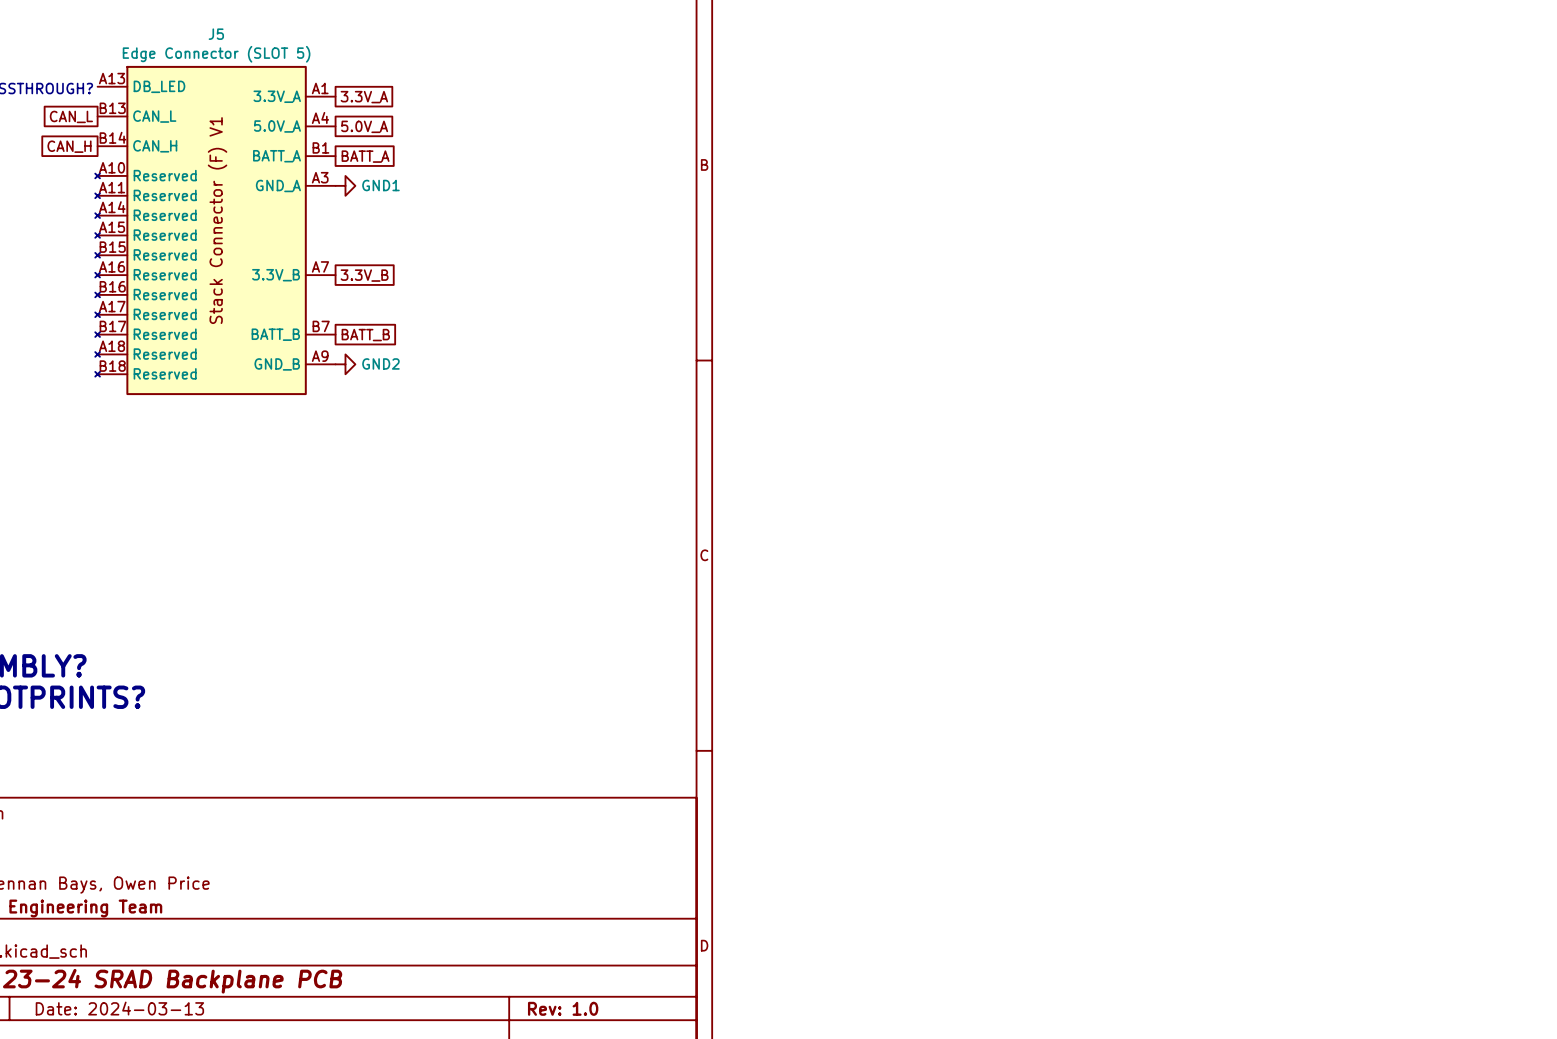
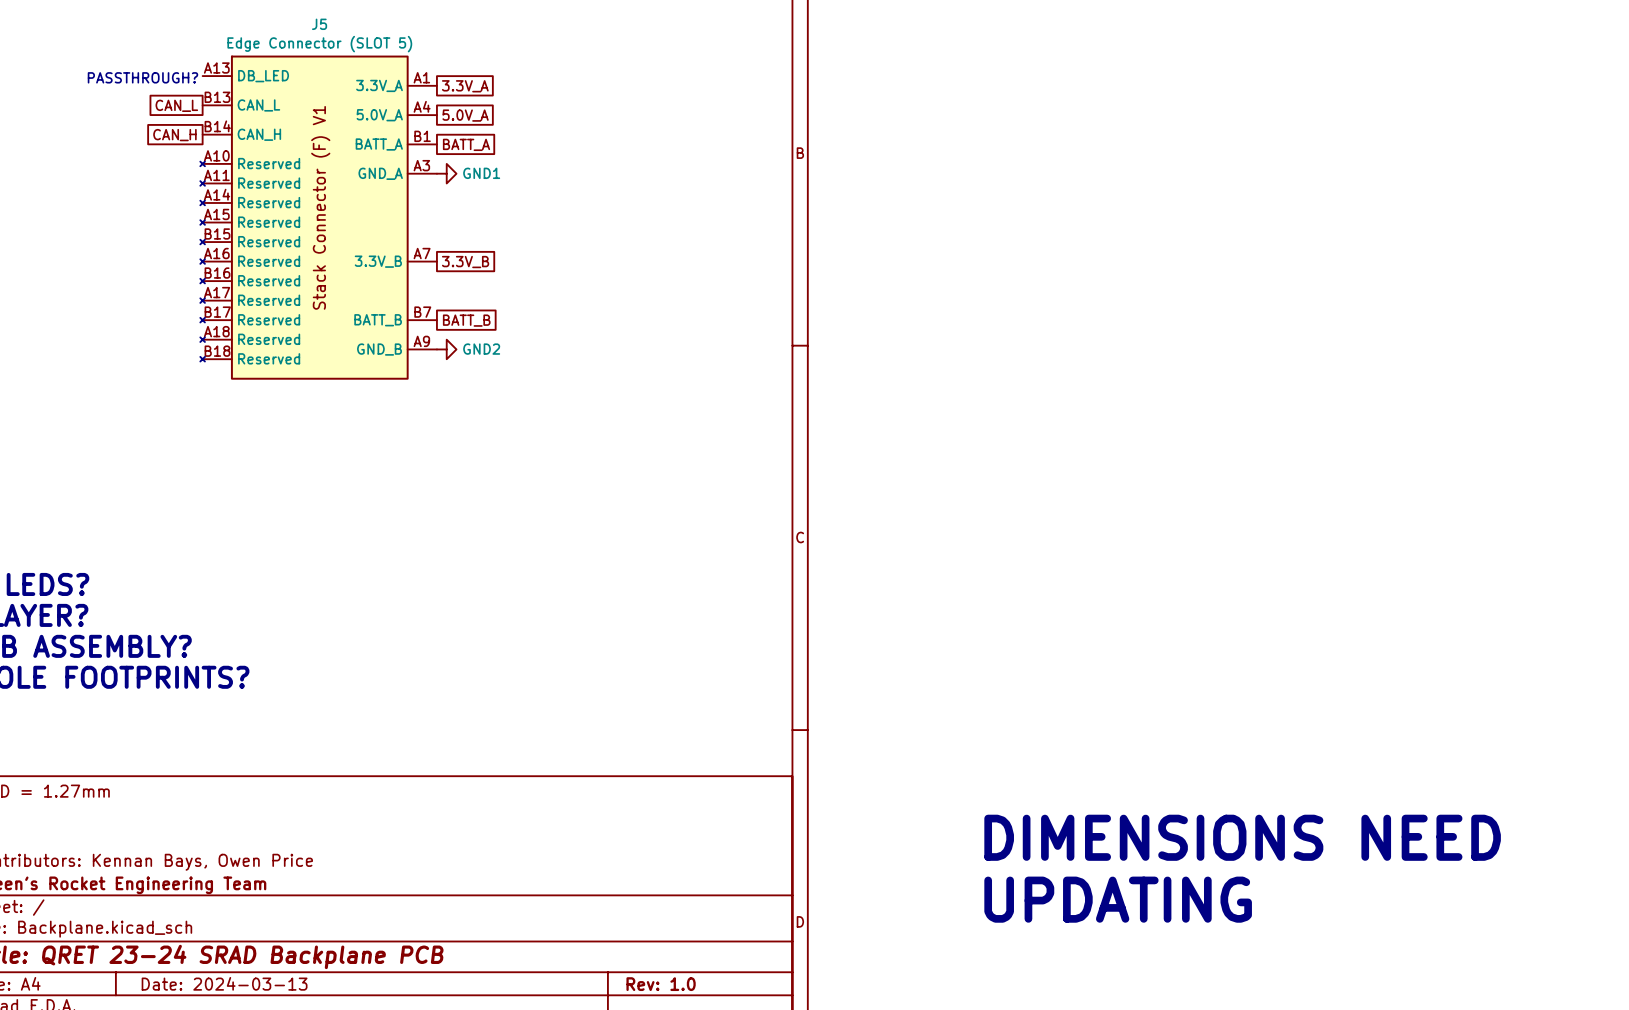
text: none -> DIMENSIONS NEED (1242, 837)
text: none -> UPDATING (1118, 899)

